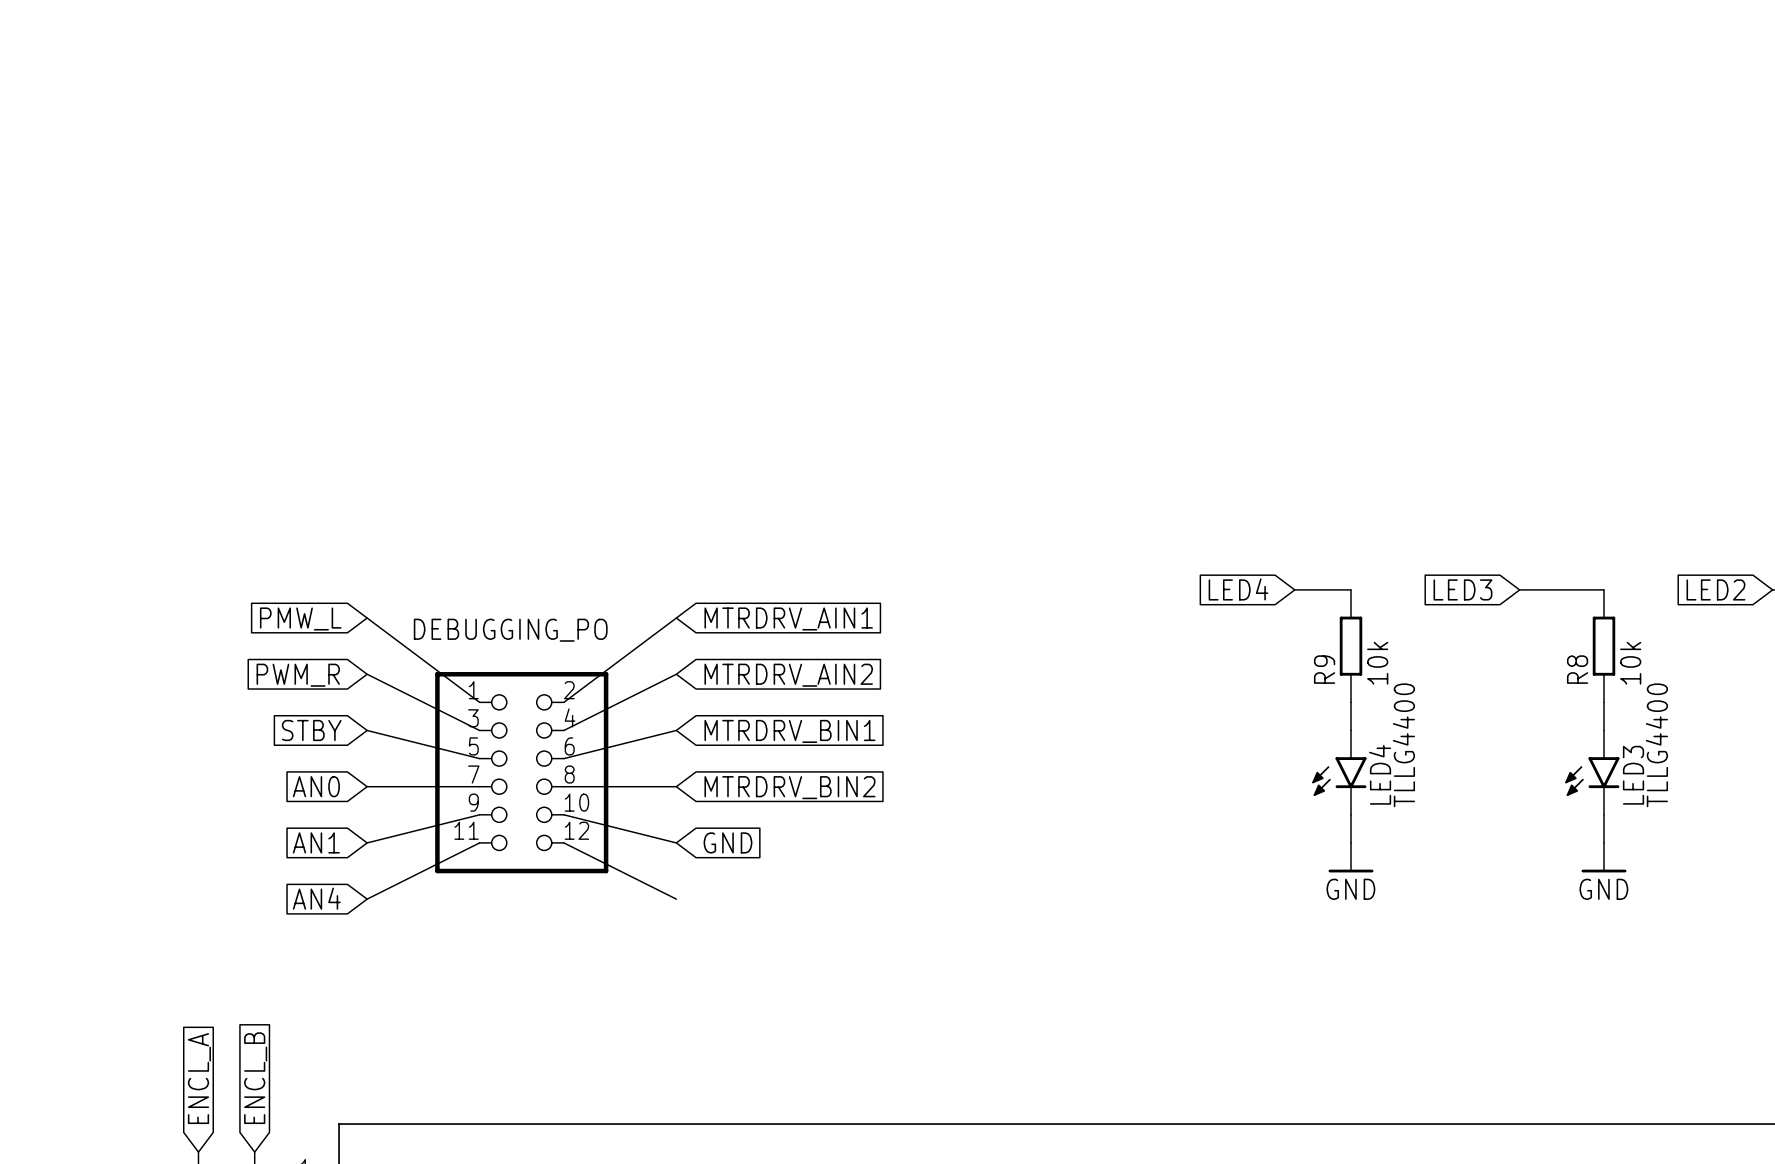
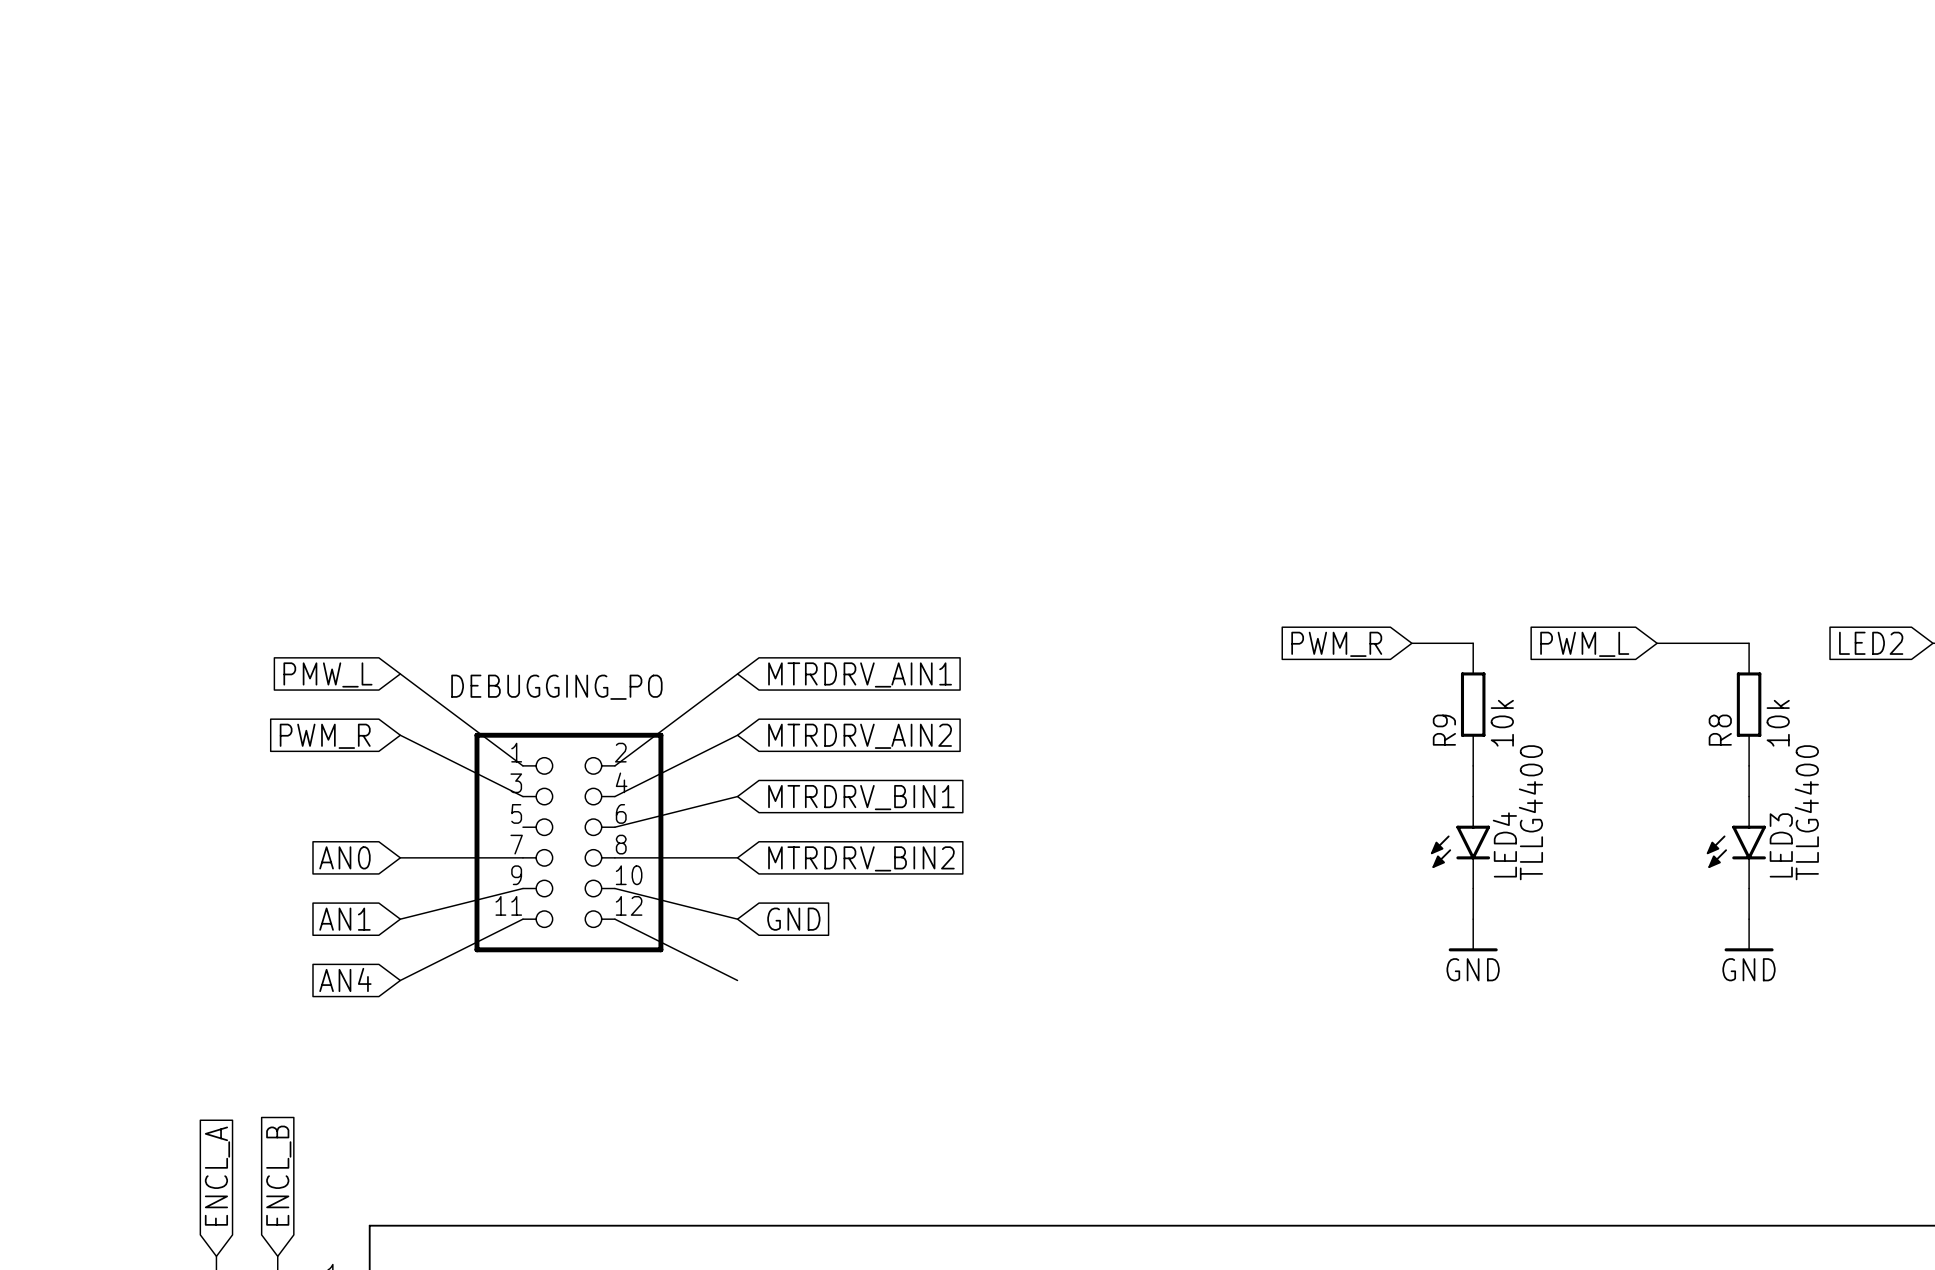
global label: LED4 (1238, 589) -> PWM_R (1336, 644)
global label: LED3 (1462, 589) -> PWM_L (1584, 644)
global label: STBY (311, 730) -> none
wire: (367, 730) (479, 758) -> none

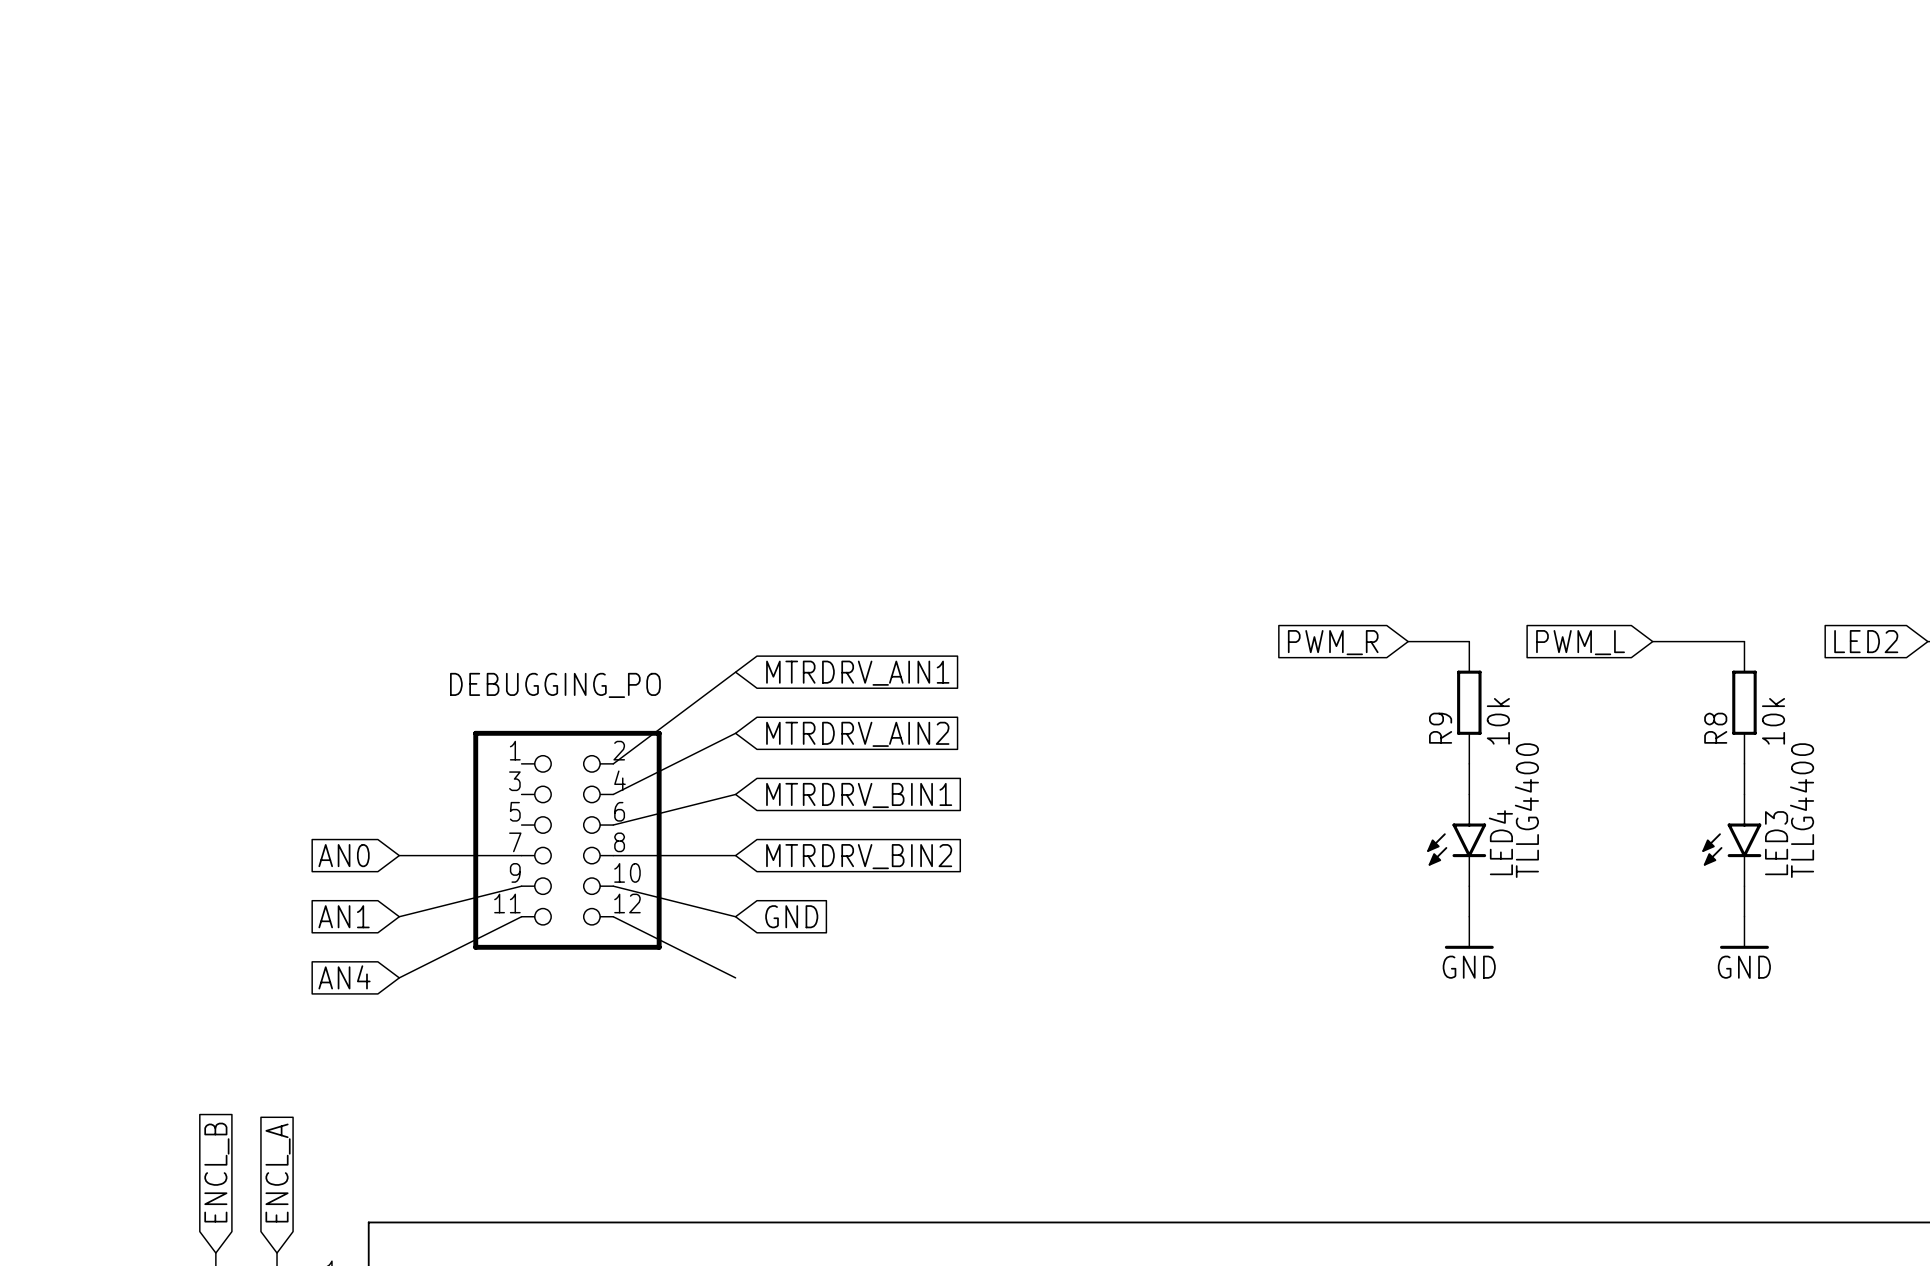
wire: (400, 673) (522, 765) -> none
global label: PMW_L (327, 674) -> none
wire: (400, 735) (522, 796) -> none
global label: PWM_R (325, 736) -> none
global label: ENCL_B (278, 1175) -> ENCL_A (278, 1173)
global label: ENCL_A (217, 1176) -> ENCL_B (216, 1172)

